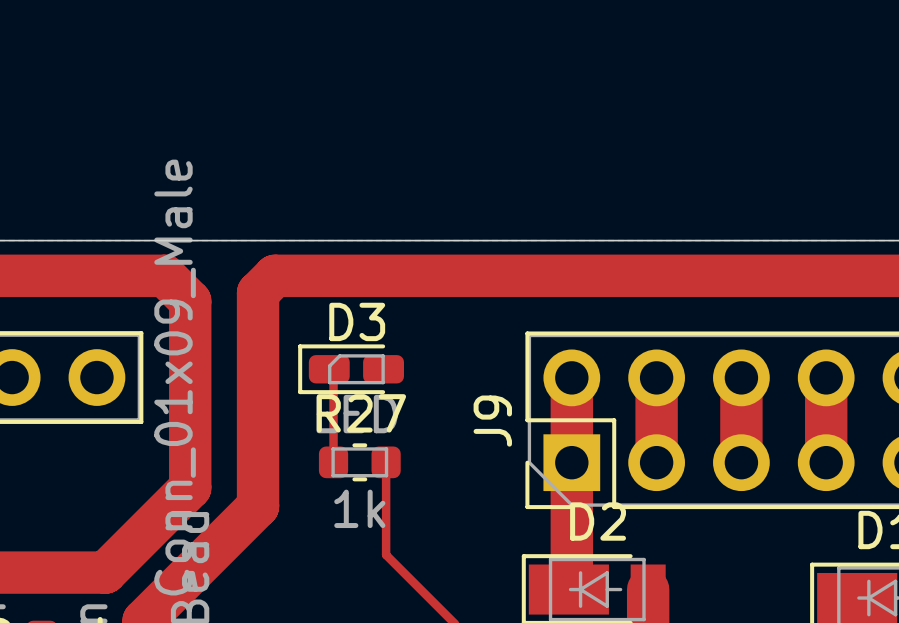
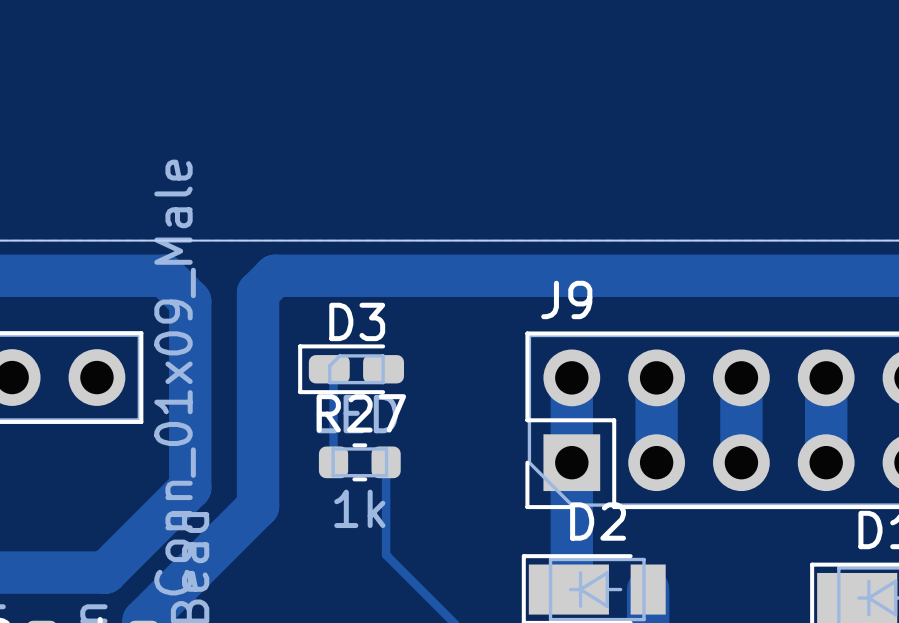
J9 name rotation: 0° (492, 421) -> 90° clockwise (566, 299)
J9 name position: J9 (492, 421) -> J9 (566, 299)

